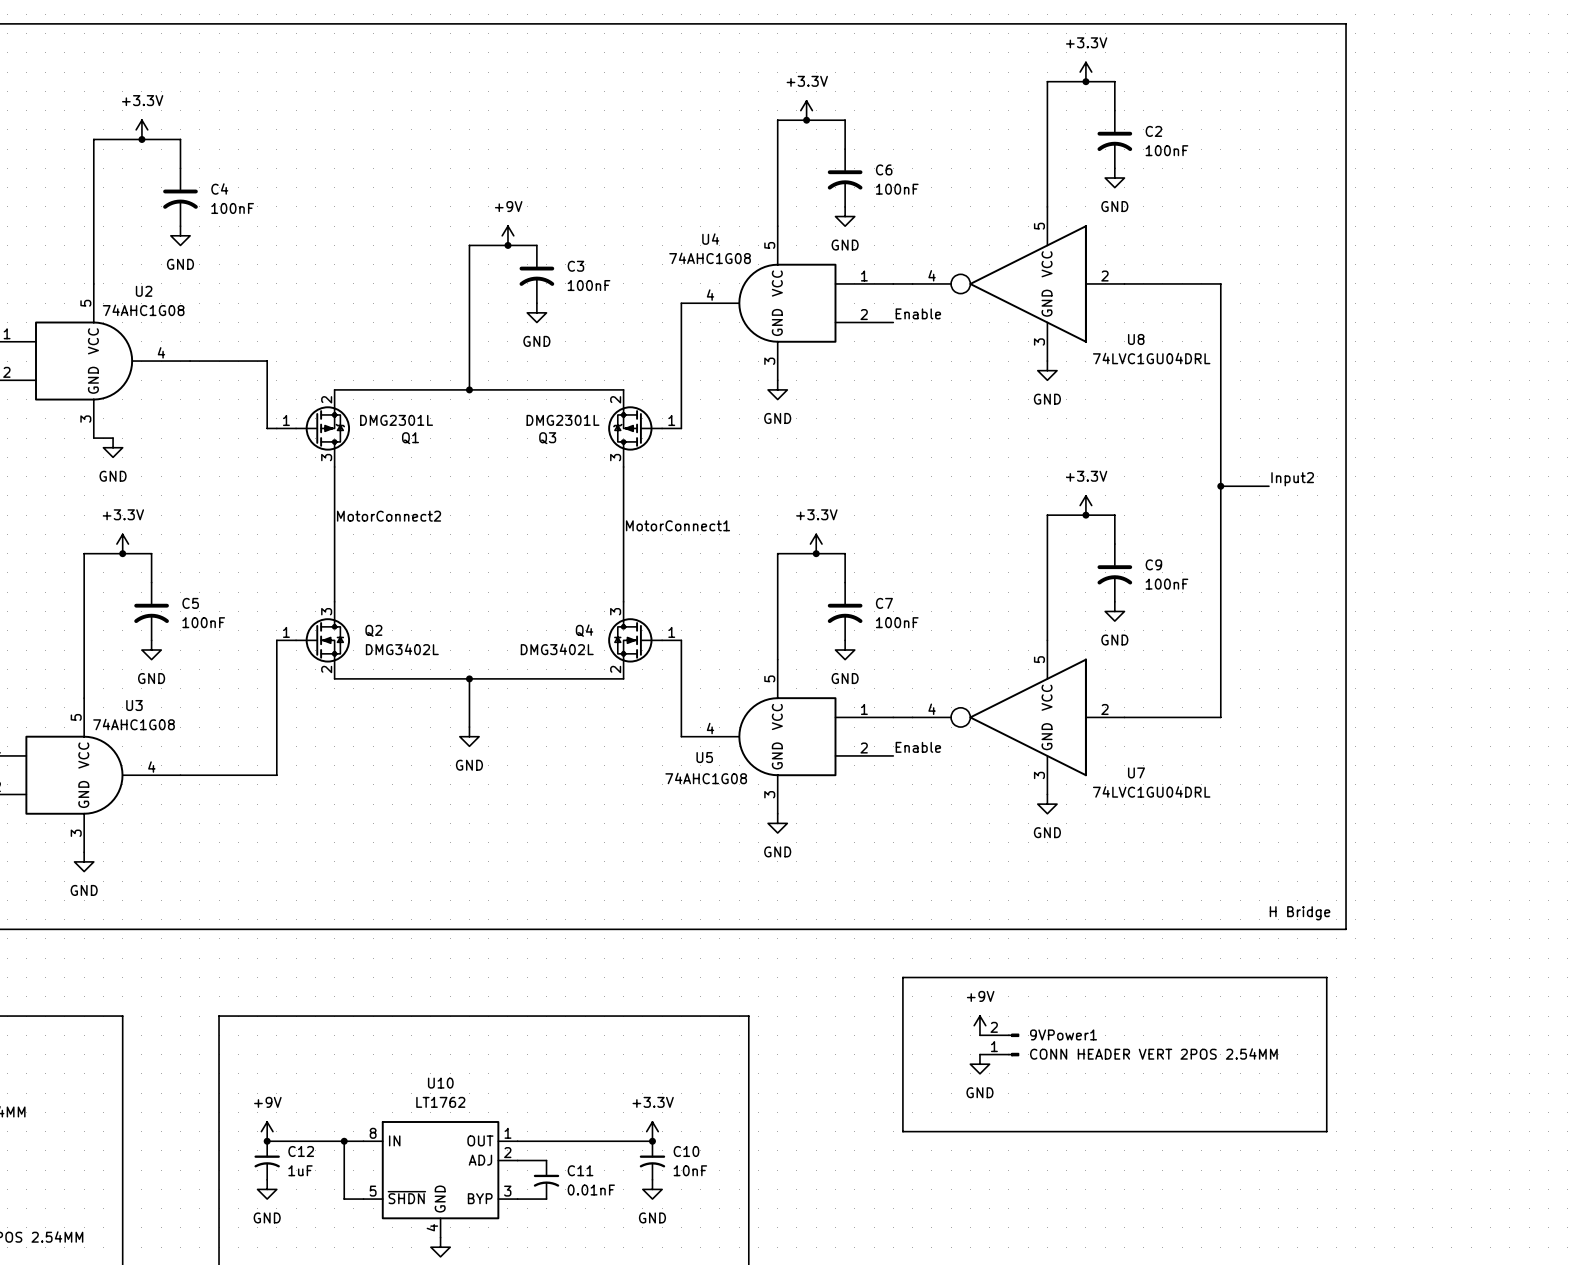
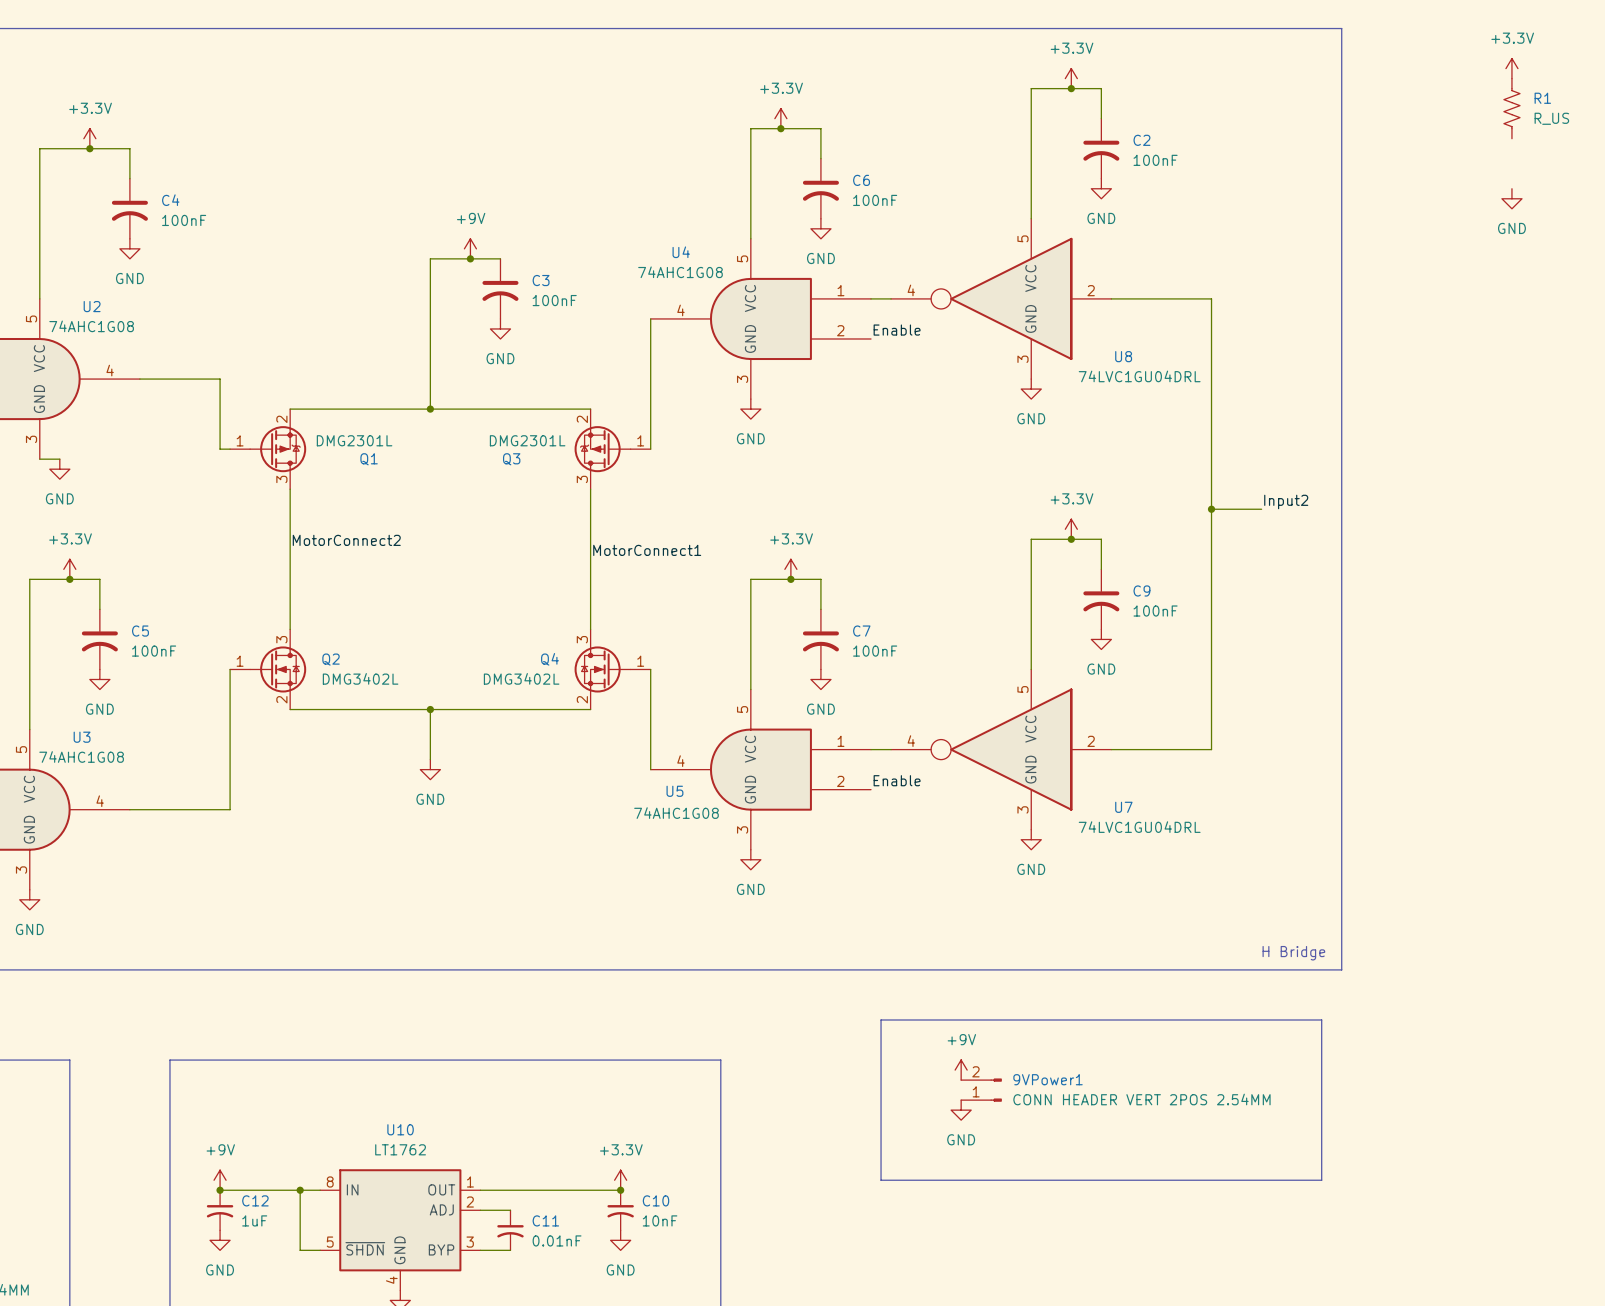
power symbol: none -> +3.3V (1511, 68)
R1: none -> R_US (1511, 108)
power symbol: none -> GND (1511, 198)

